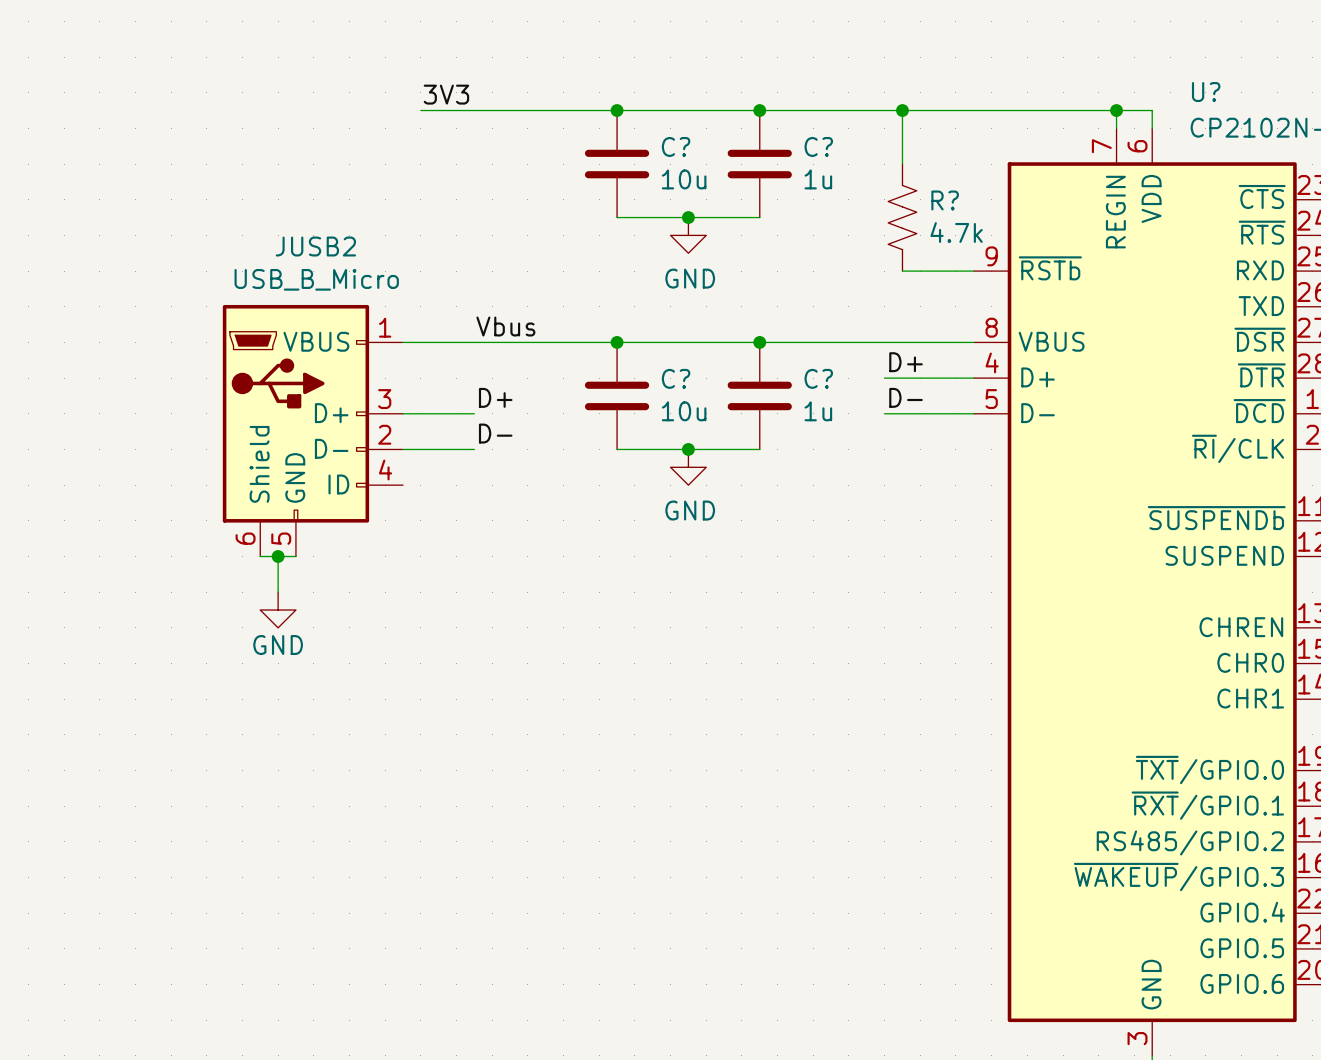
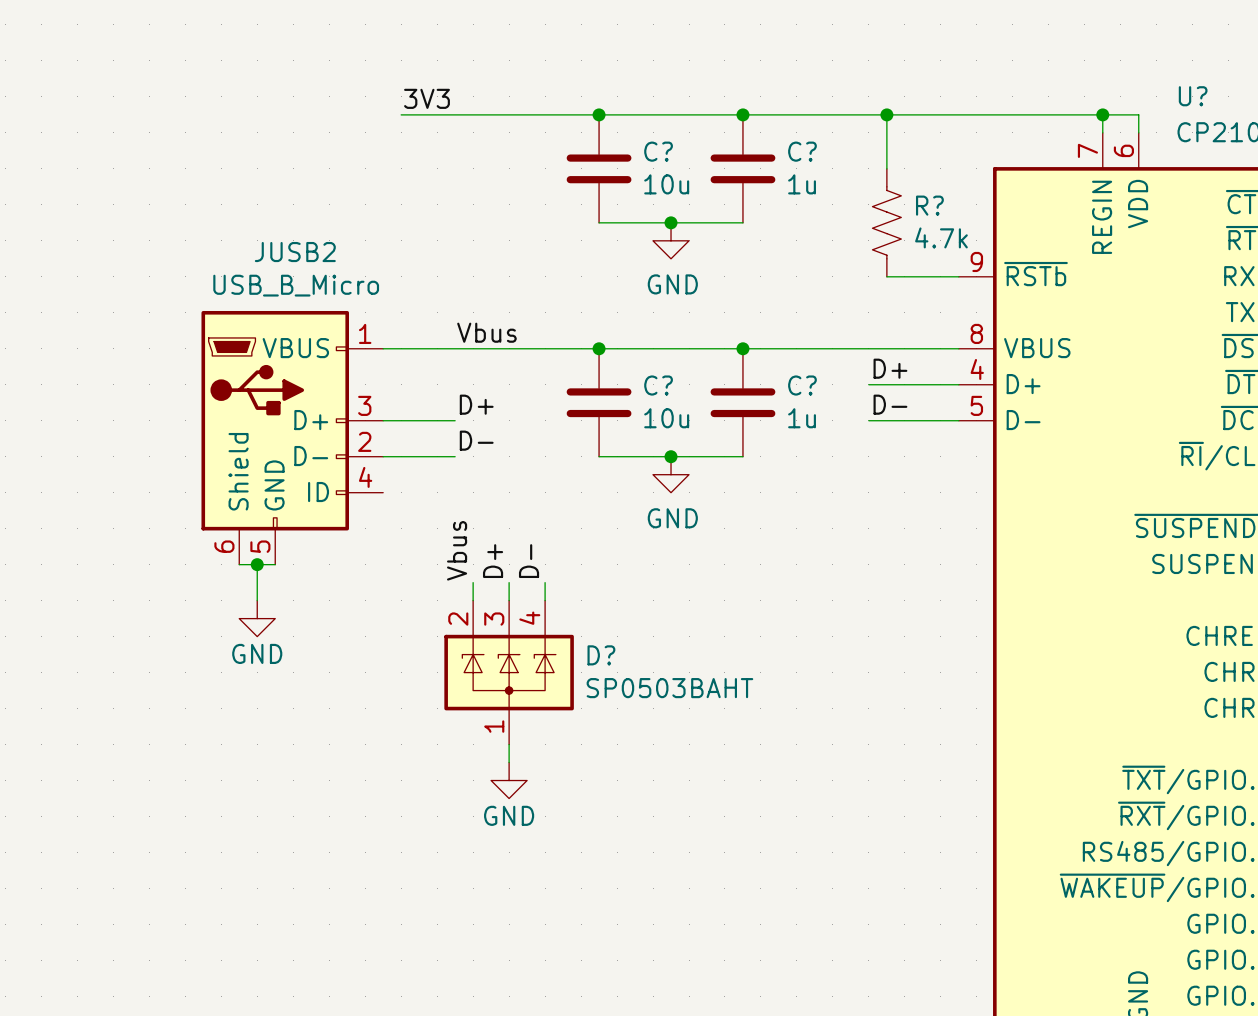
label: none -> Vbus (457, 550)
label: none -> D+ (493, 561)
label: none -> D- (529, 561)
wire: none -> (473, 582) (473, 600)
wire: none -> (509, 582) (509, 600)
wire: none -> (545, 582) (545, 600)
D?: none -> SP0503BAHT (509, 672)
wire: none -> (509, 744) (509, 762)
power symbol: none -> GND (509, 780)

